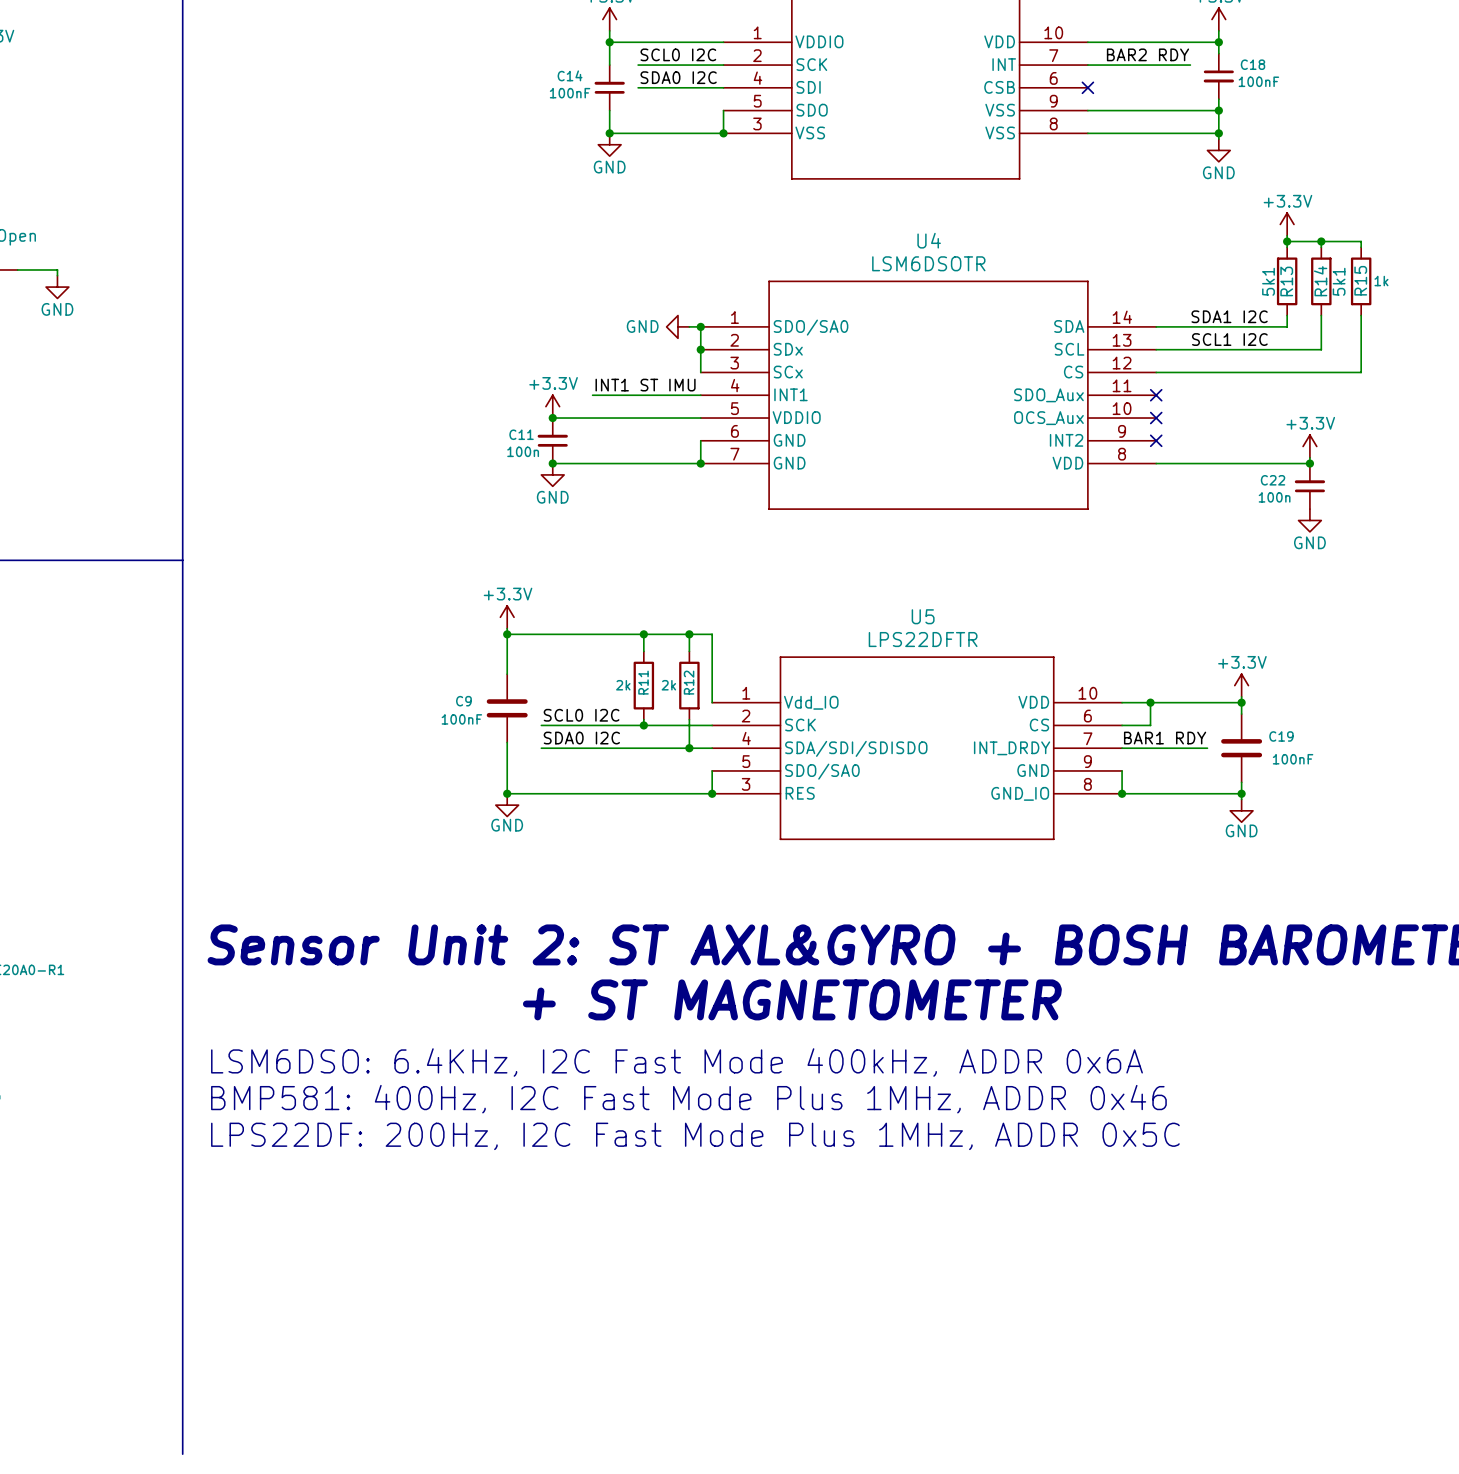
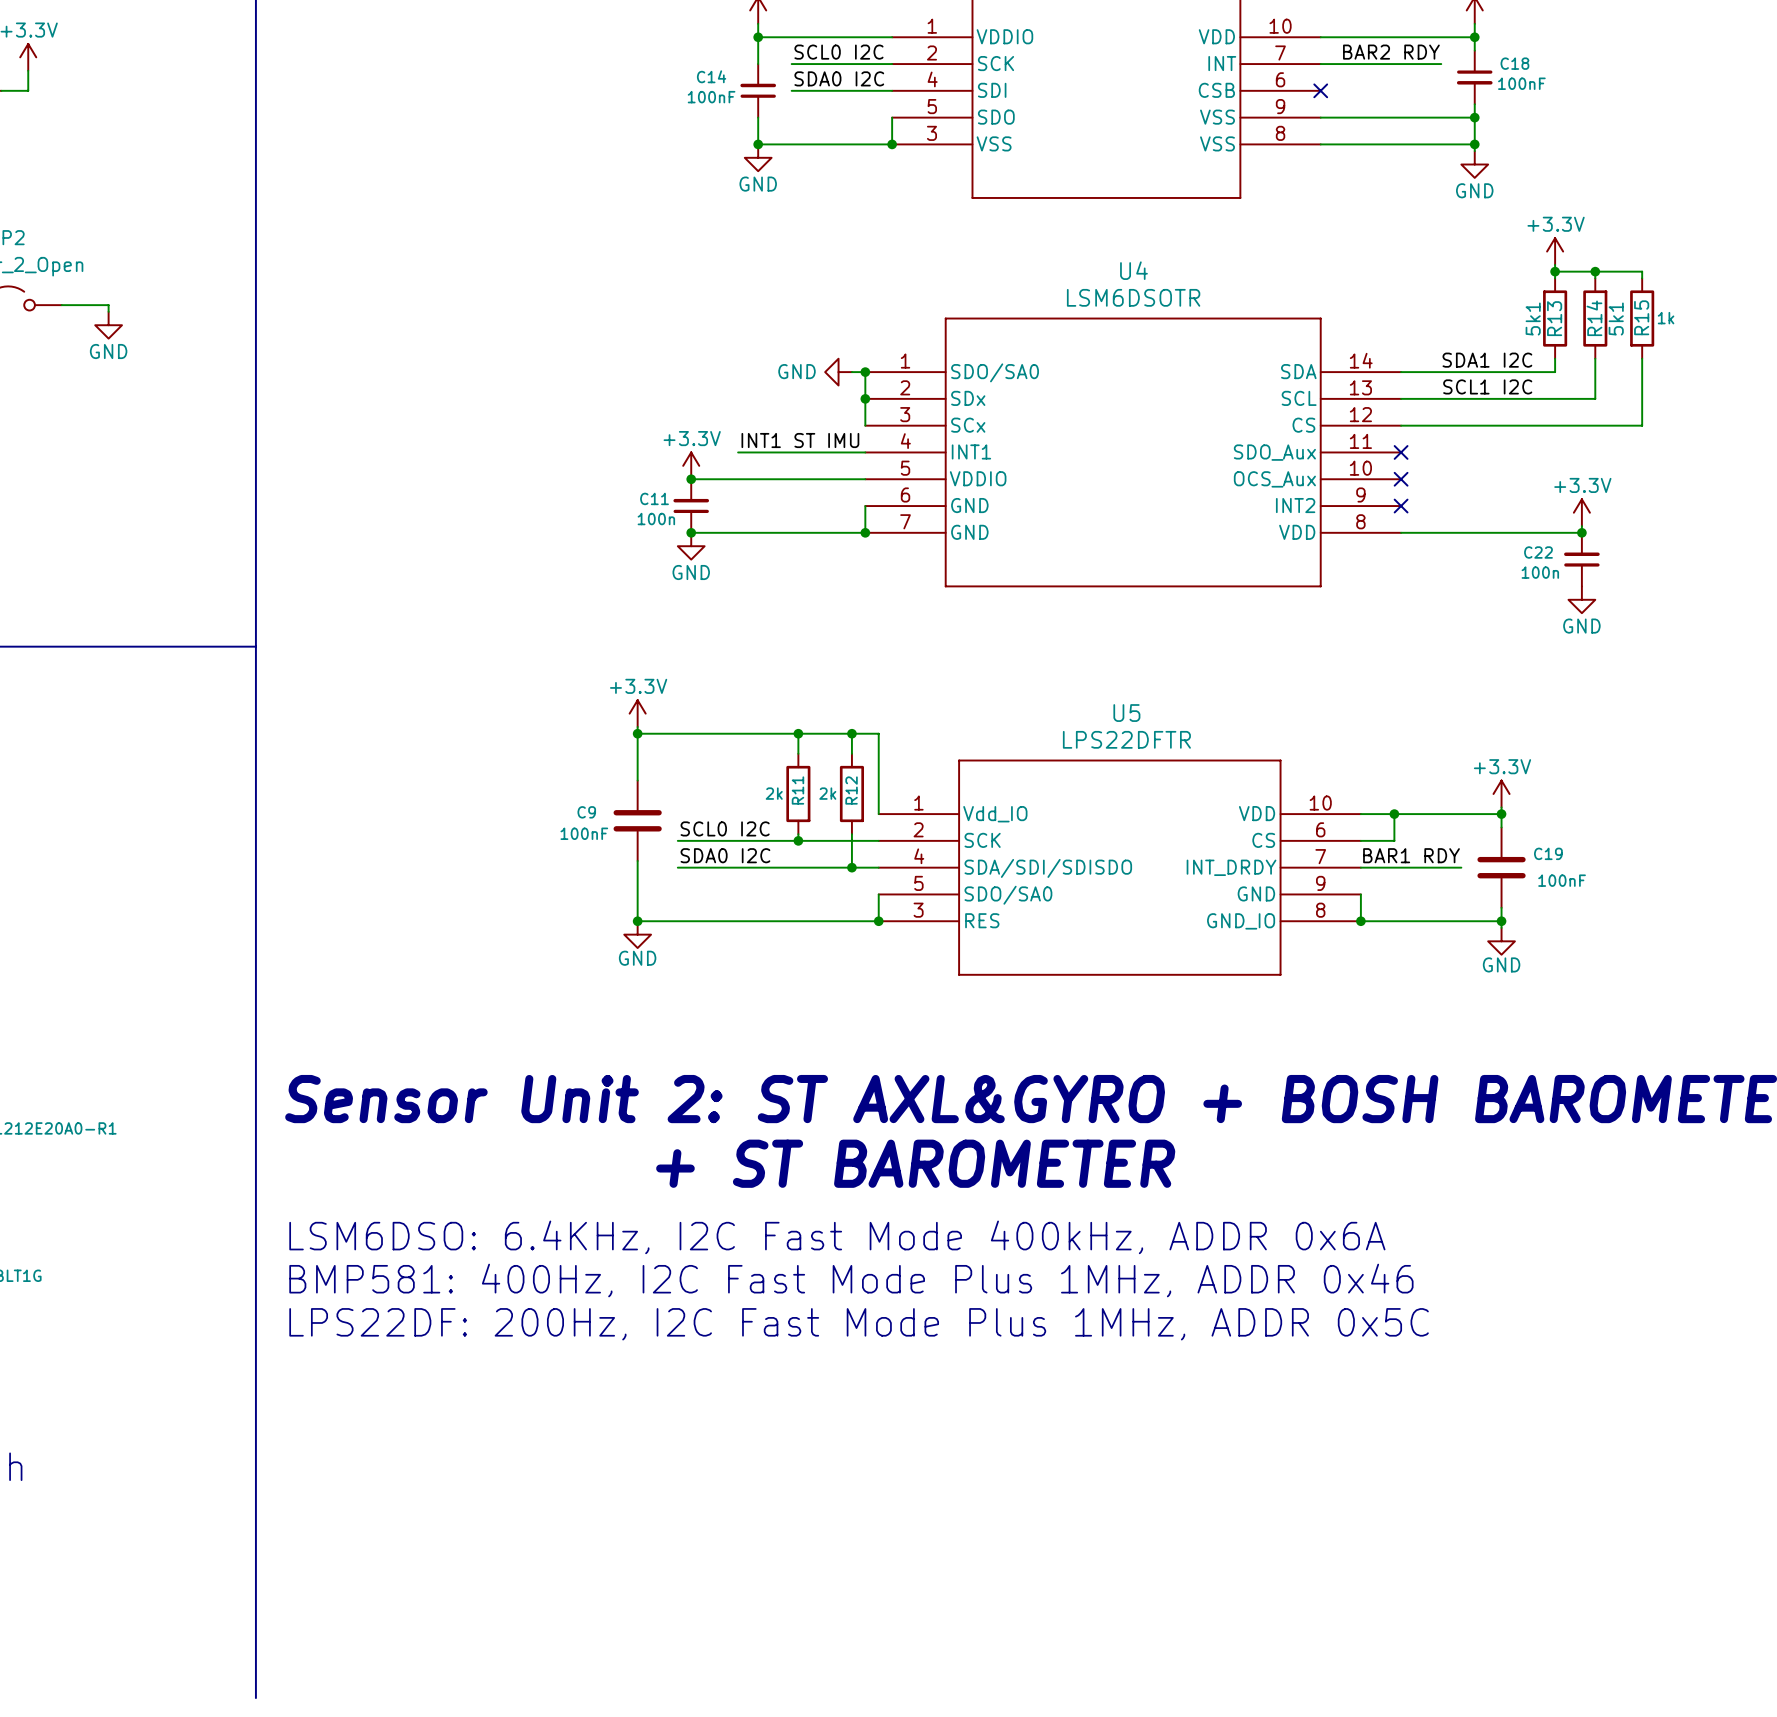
text: + ST MAGNETOMETER (792, 999) -> + ST BAROMETER (915, 1163)

